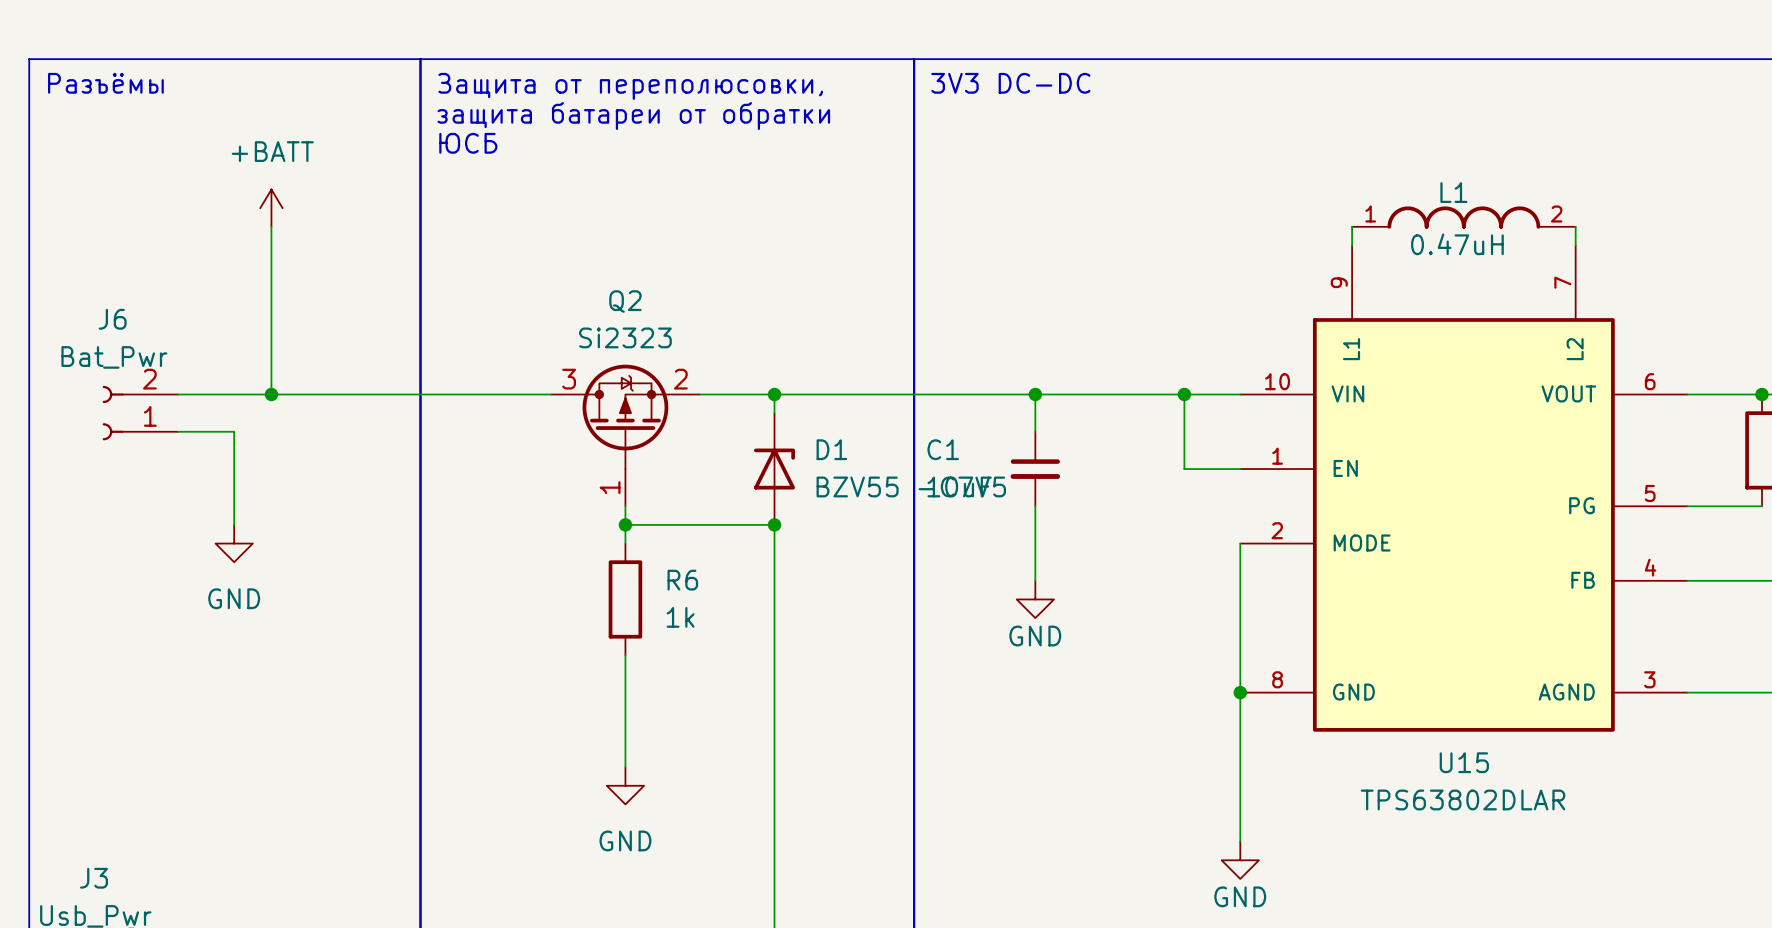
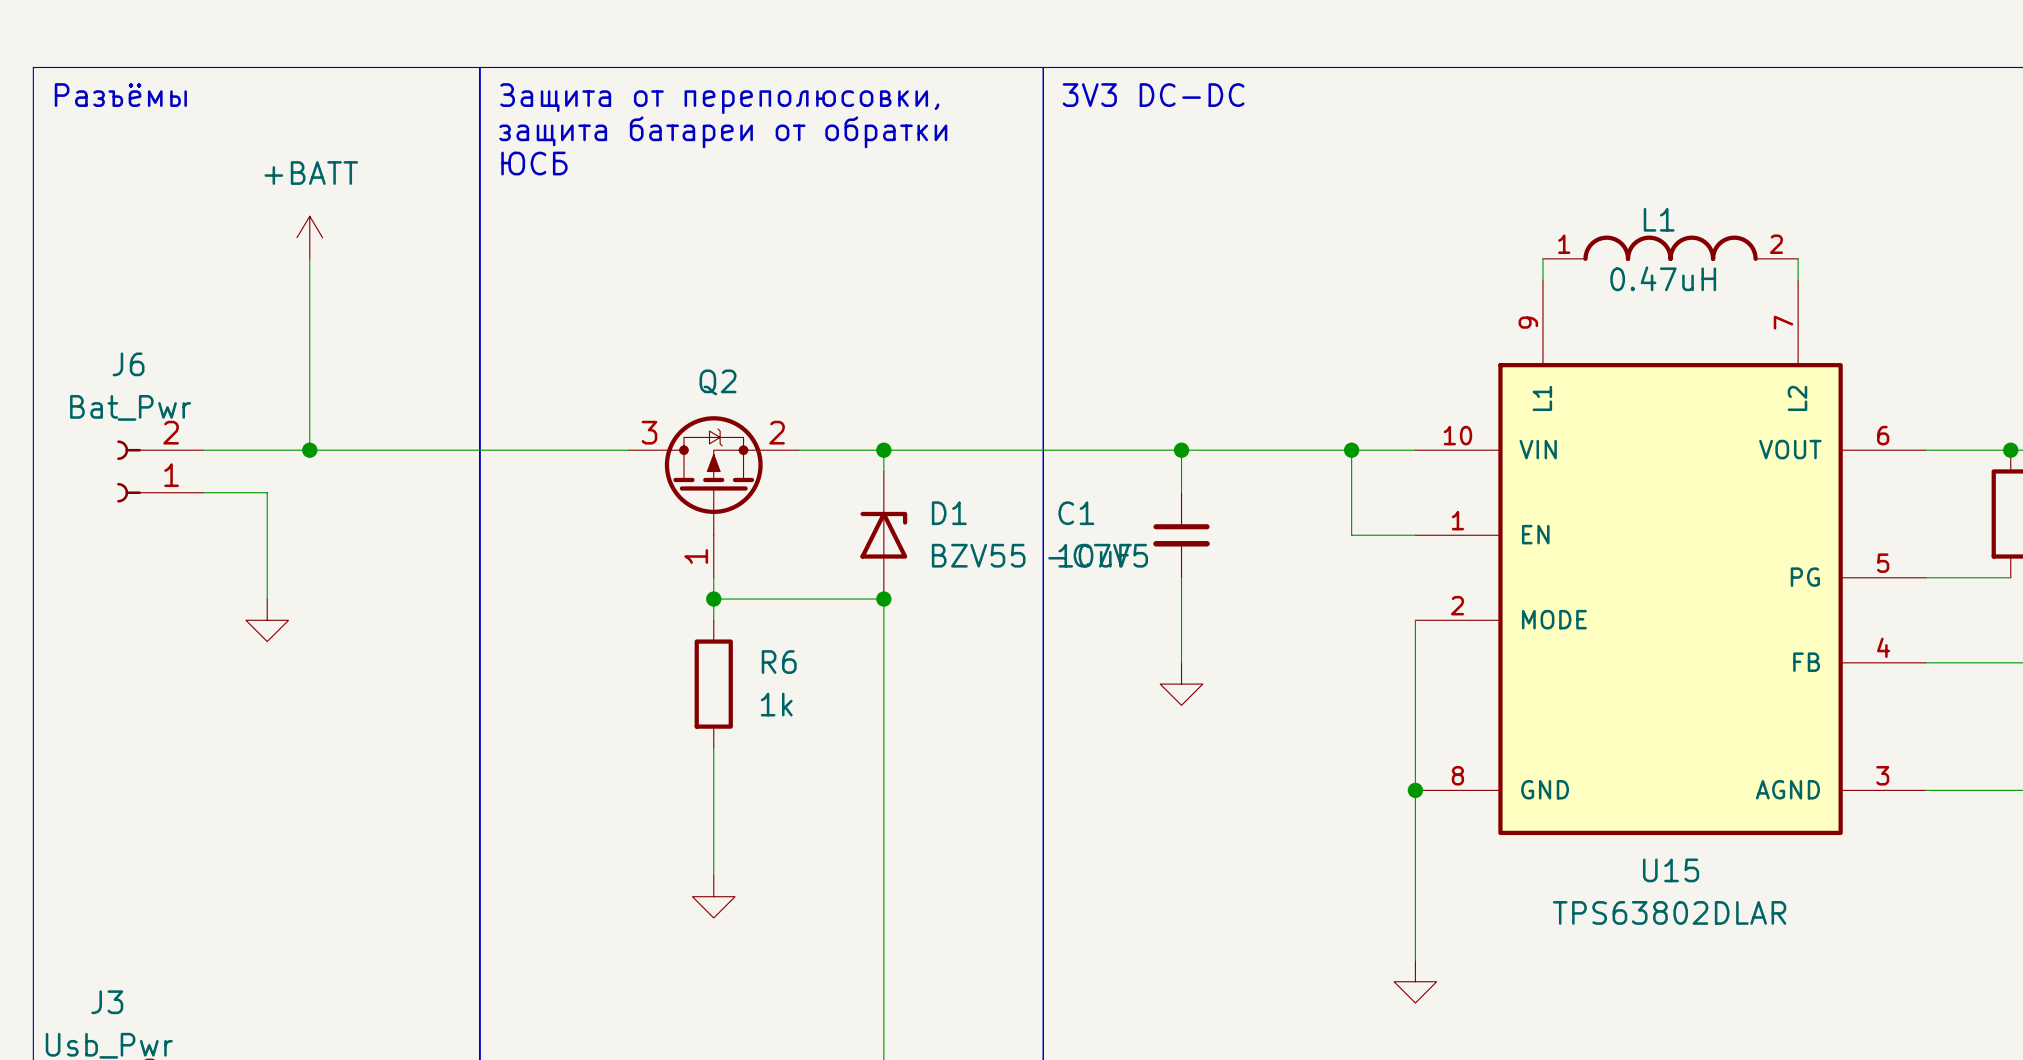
Q2 name position: Q2 (625, 301) -> Q2 (718, 382)
Q2 value: Si2323 (625, 337) -> none
power symbol text: GND (234, 598) -> none
power symbol text: GND (1035, 636) -> none
power symbol text: GND (625, 840) -> none
power symbol text: GND (1240, 896) -> none

